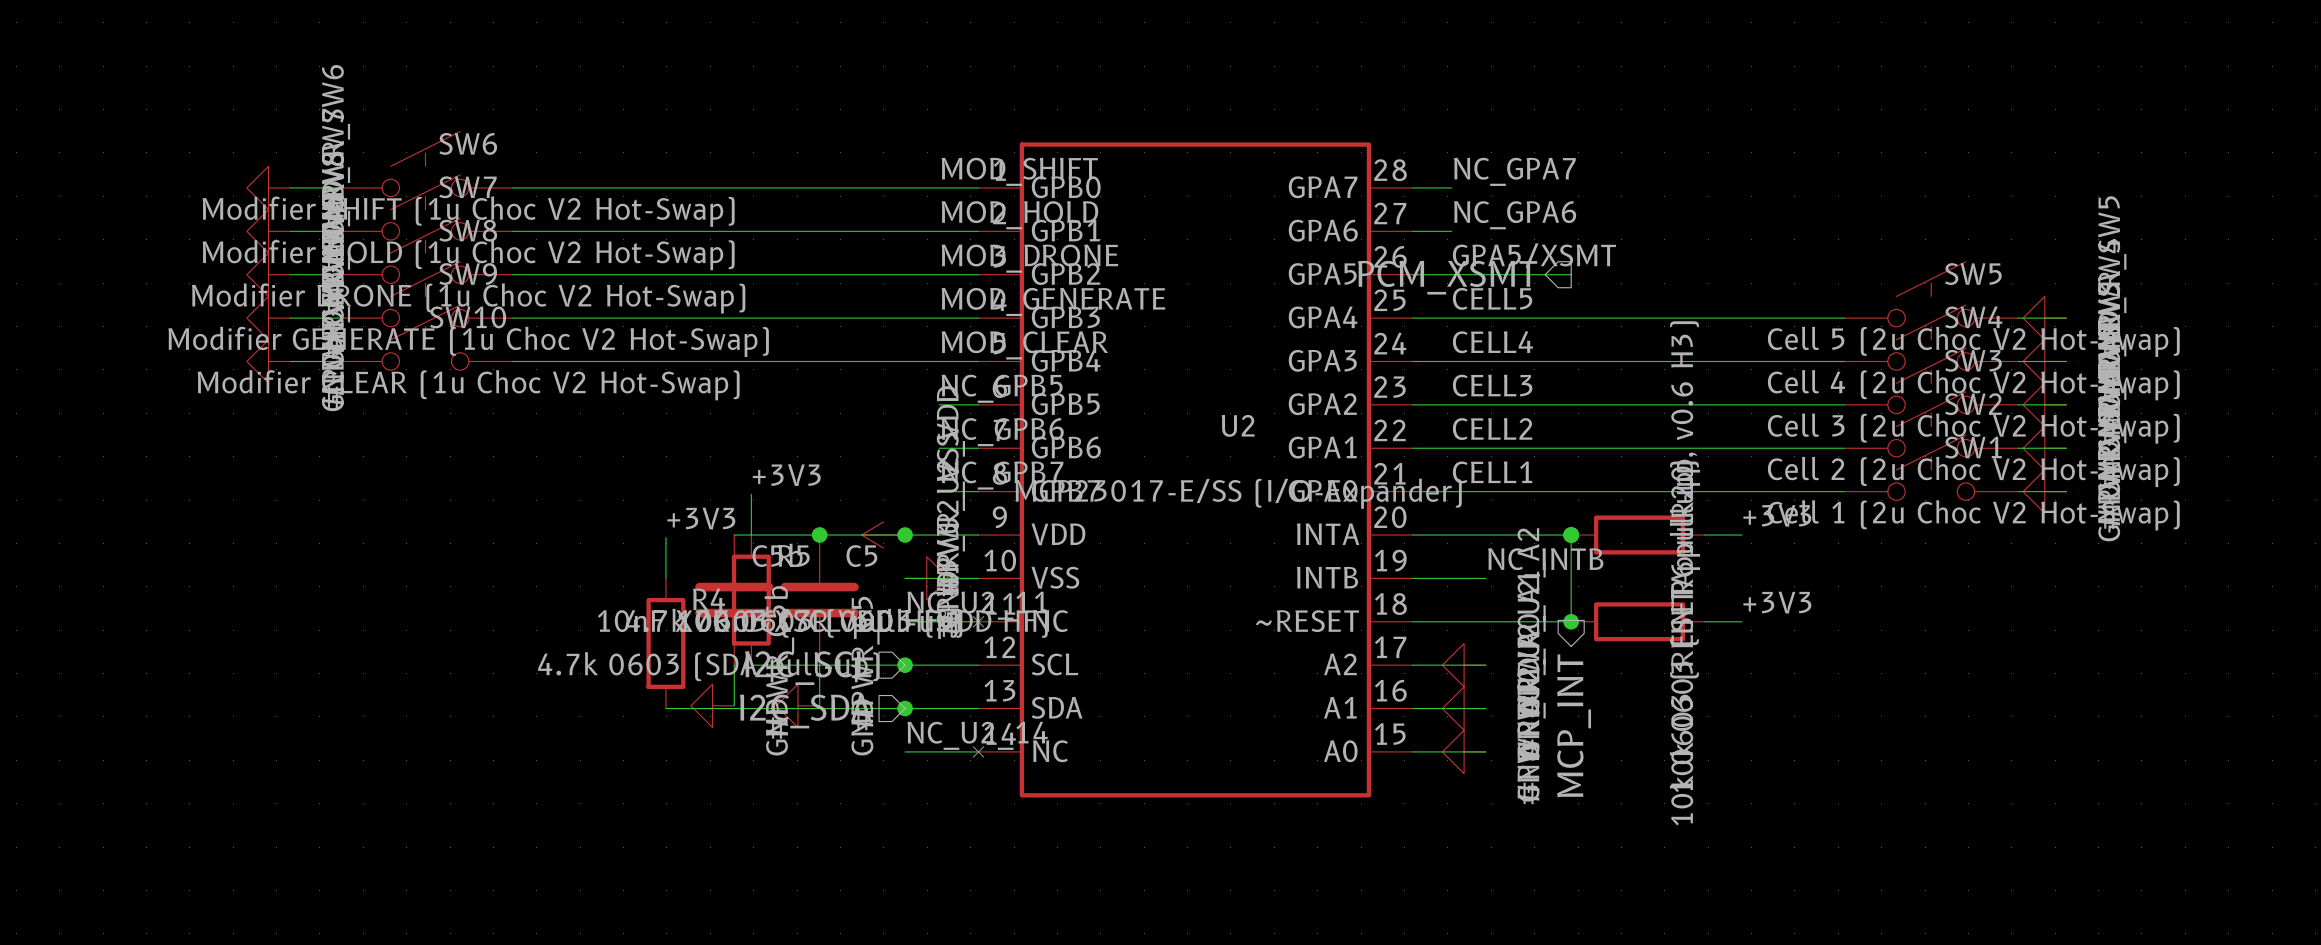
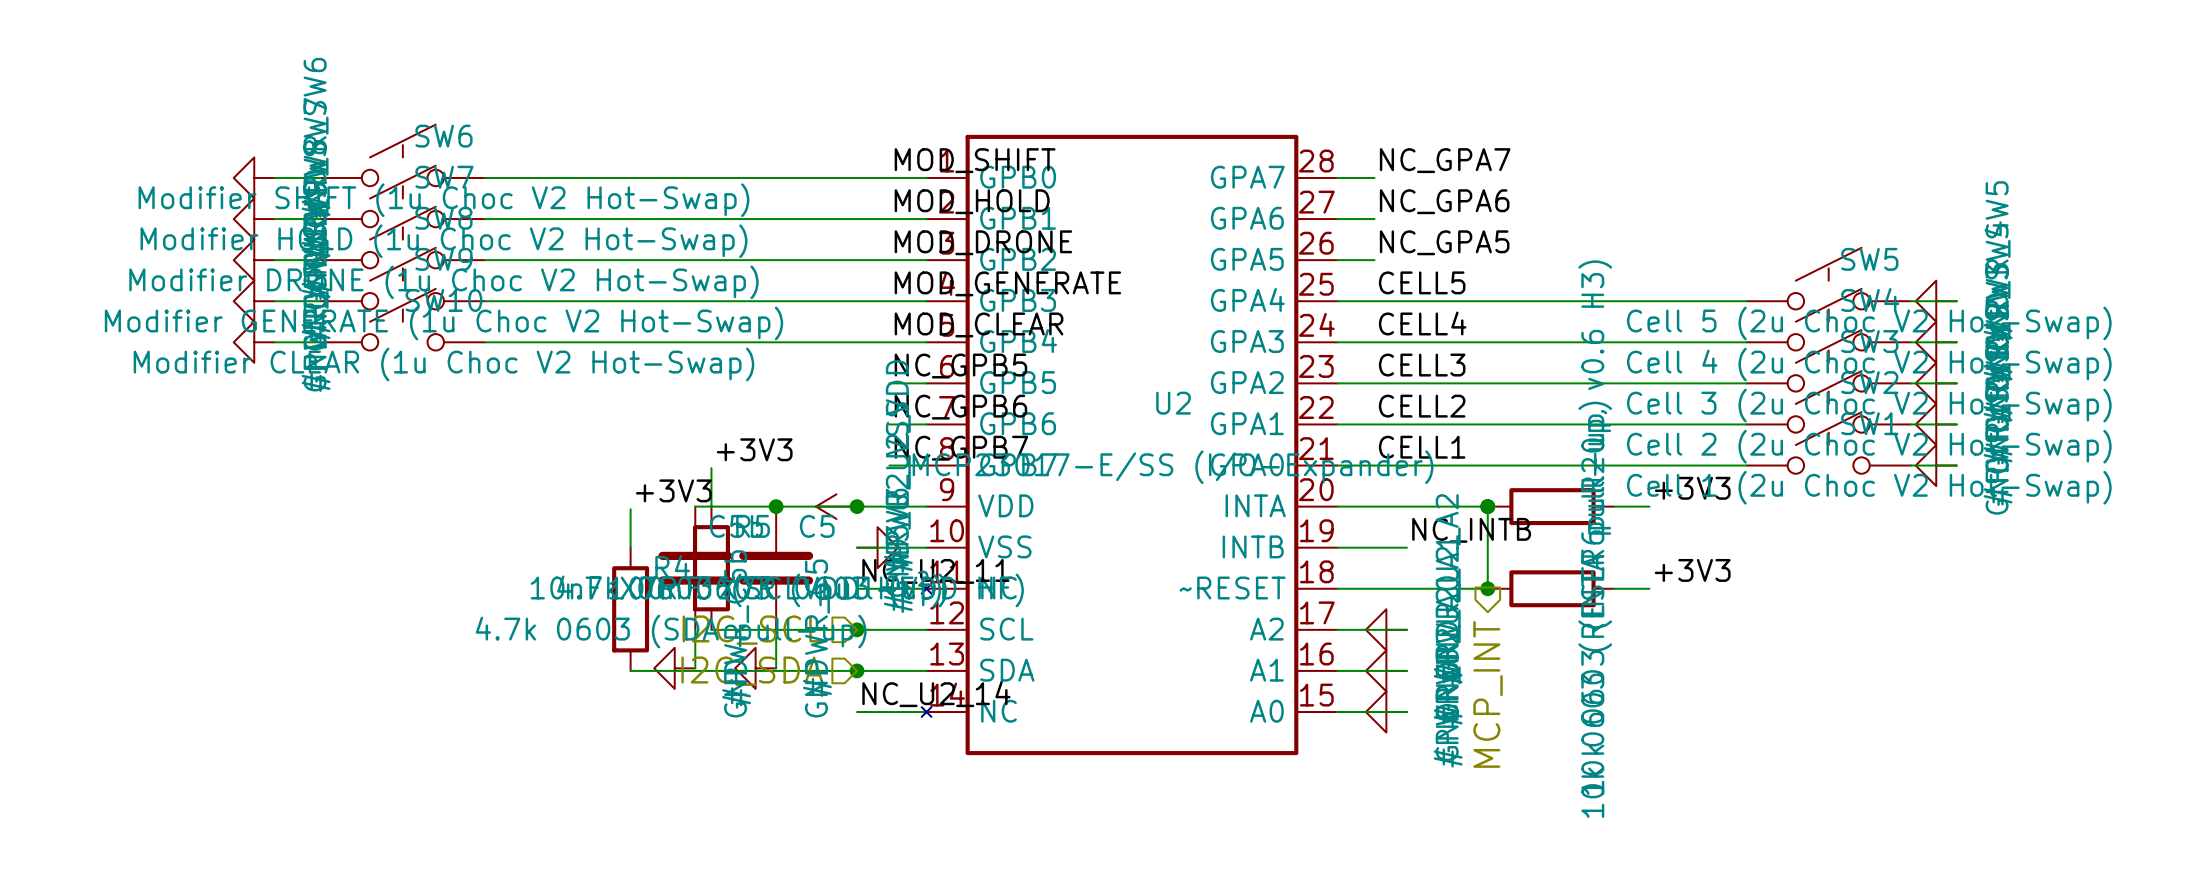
label: GPA5/XSMT (1534, 255) -> NC_GPA5 (1444, 242)
wire: (1451, 274) (1571, 274) -> none
hierarchical label: PCM_XSMT (1447, 277) -> none

